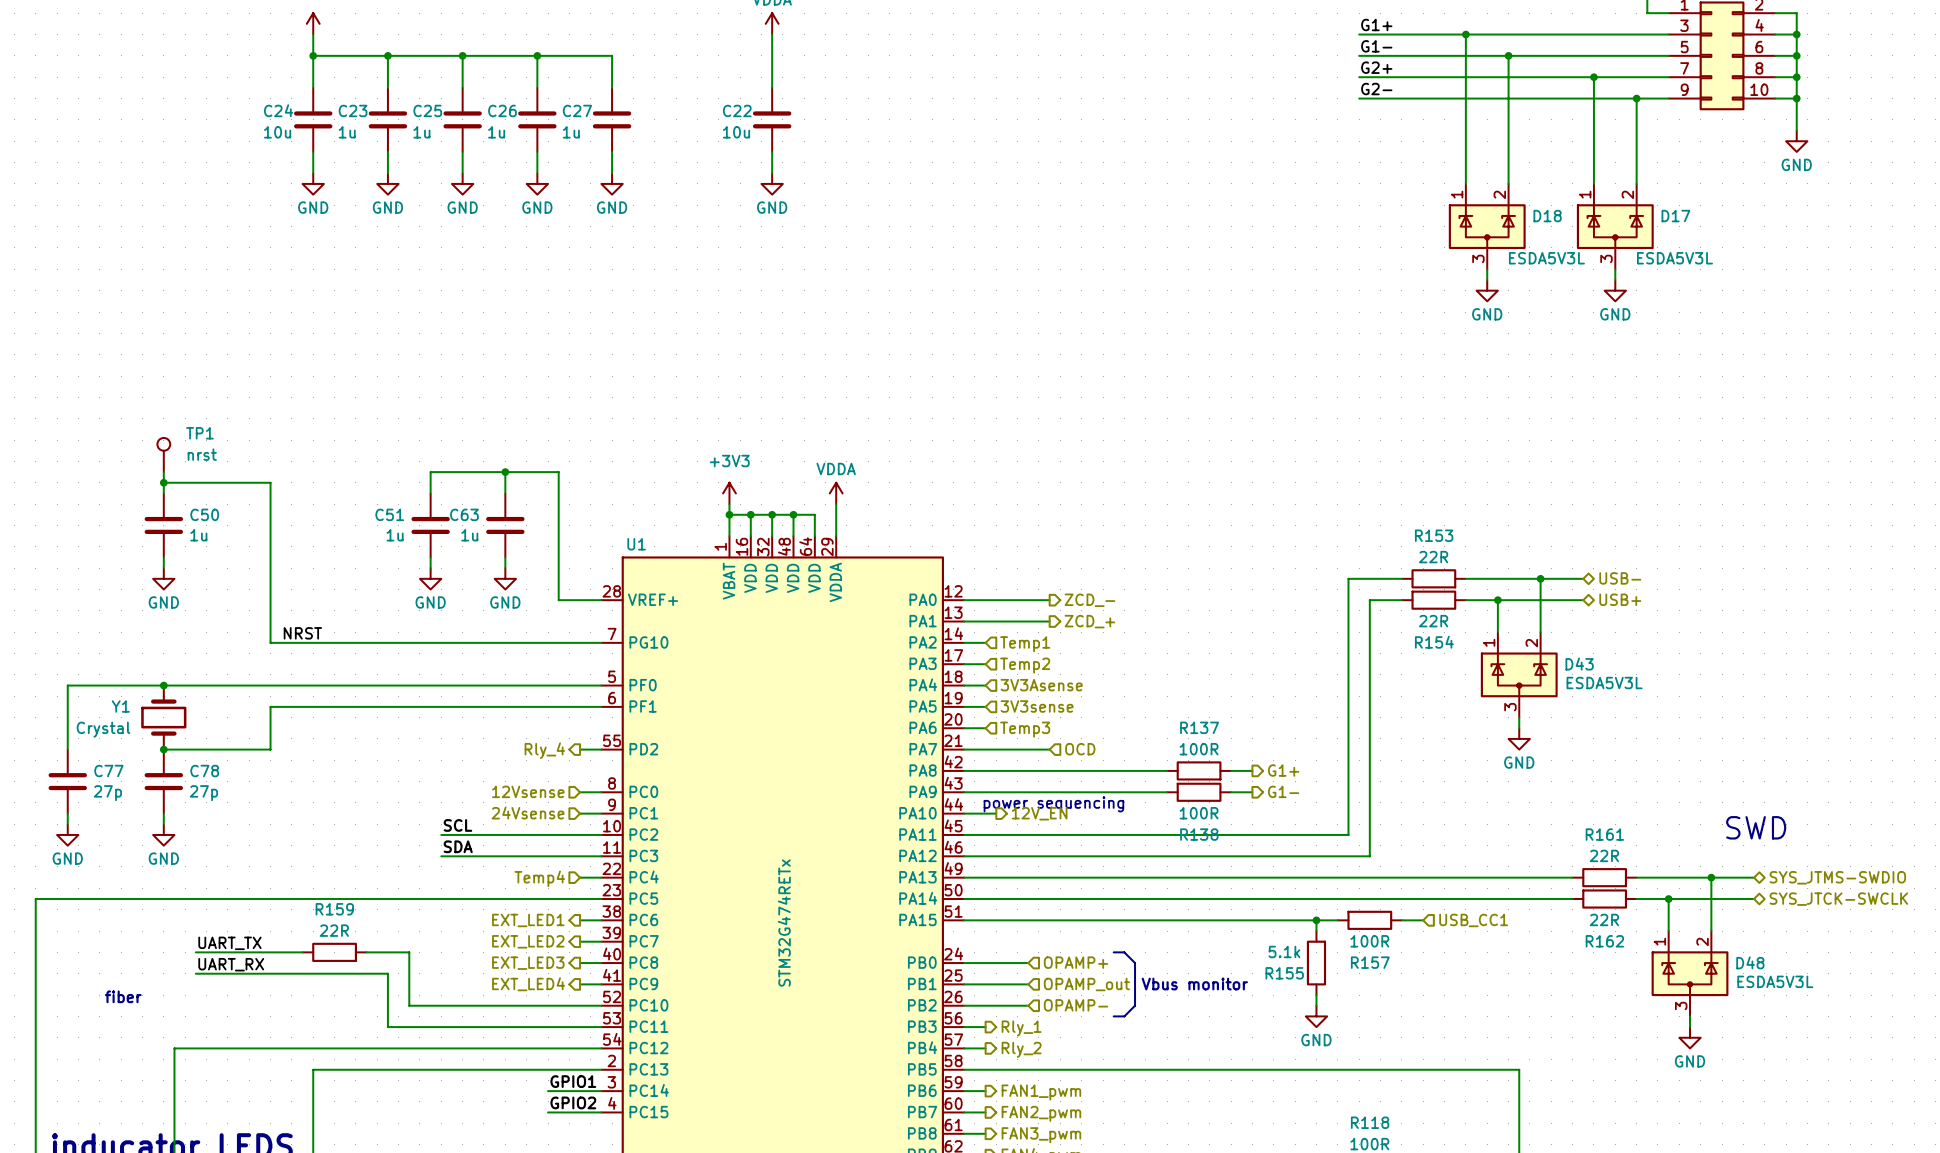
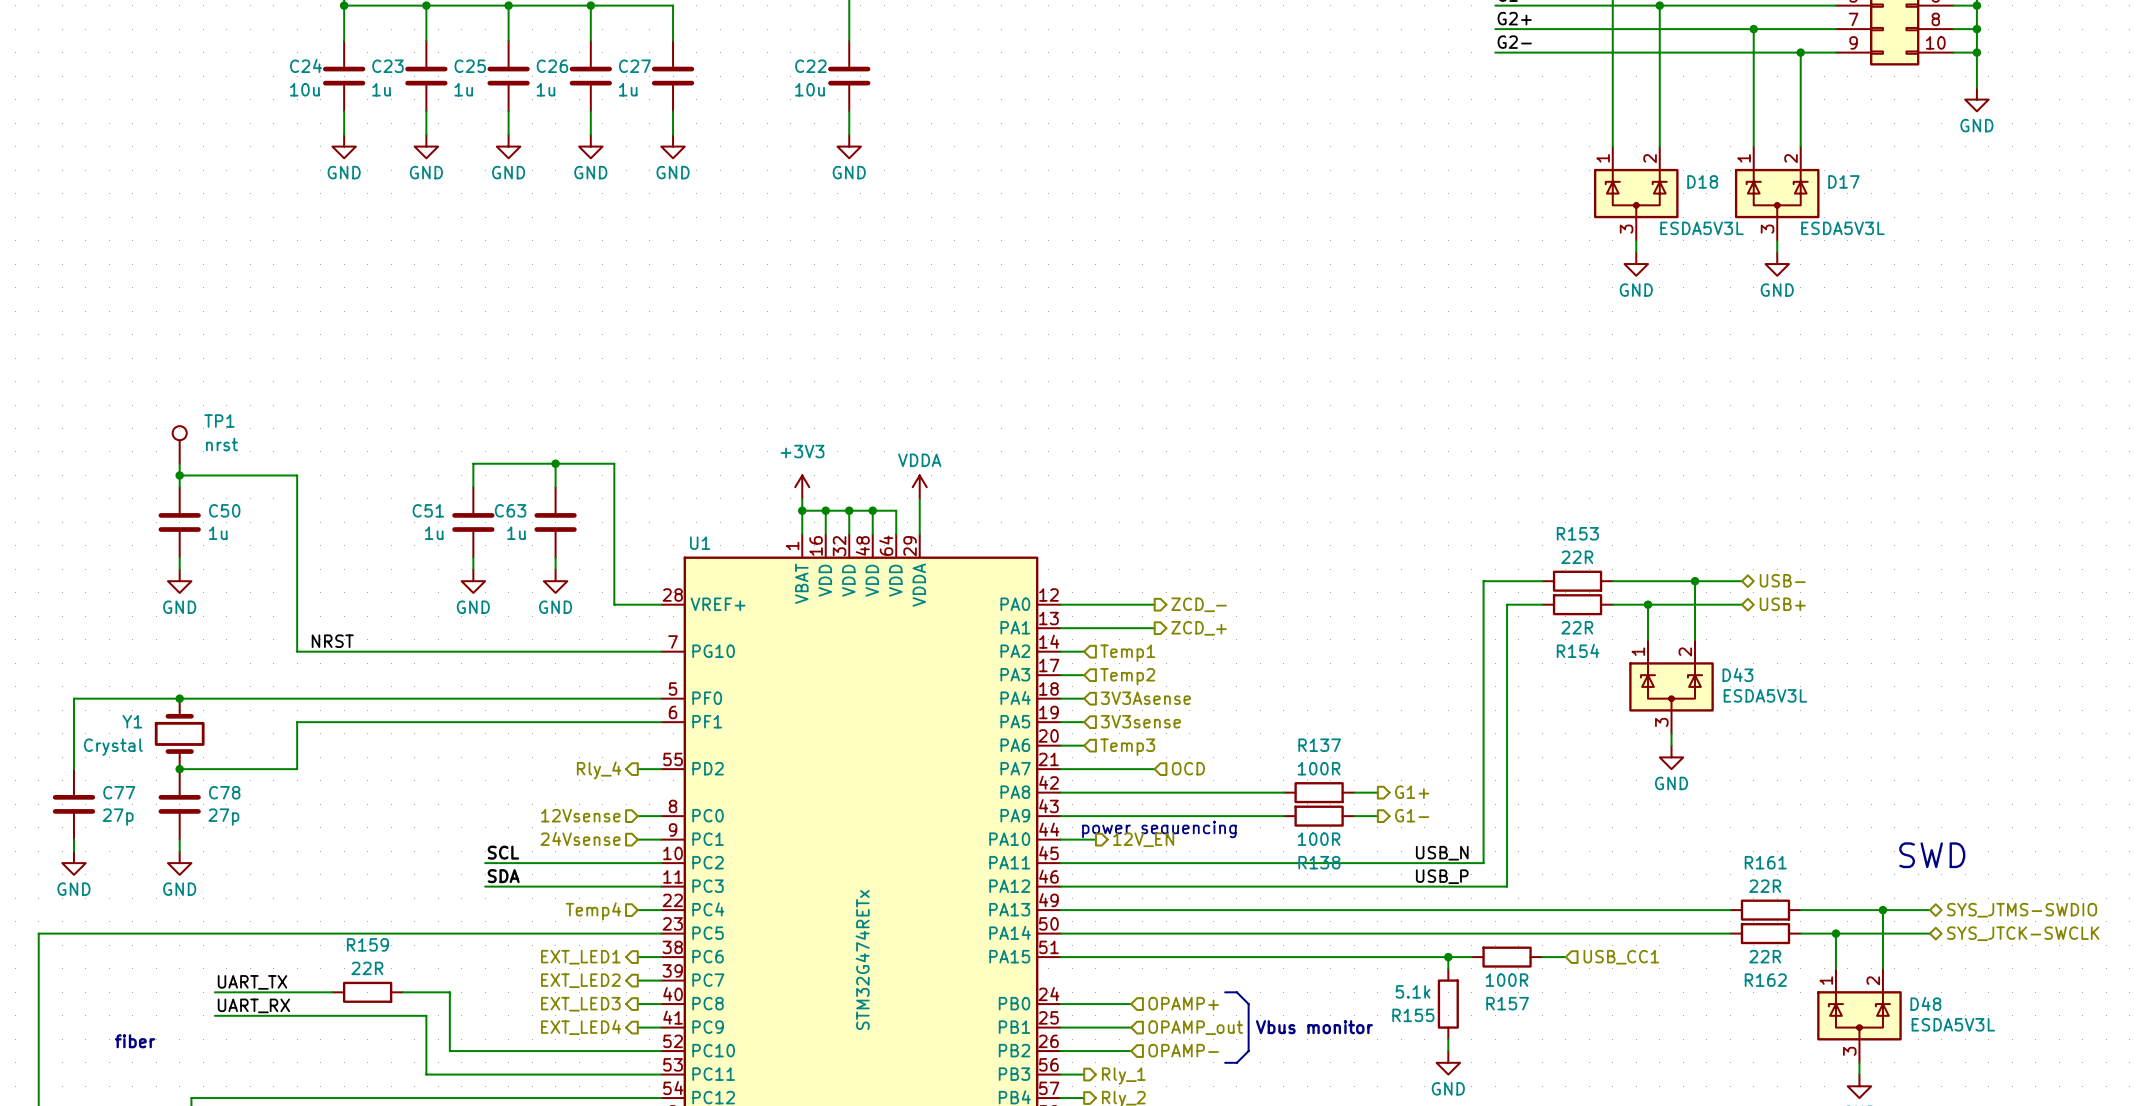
label: none -> USB_N (1442, 853)
label: none -> USB_P (1442, 876)

